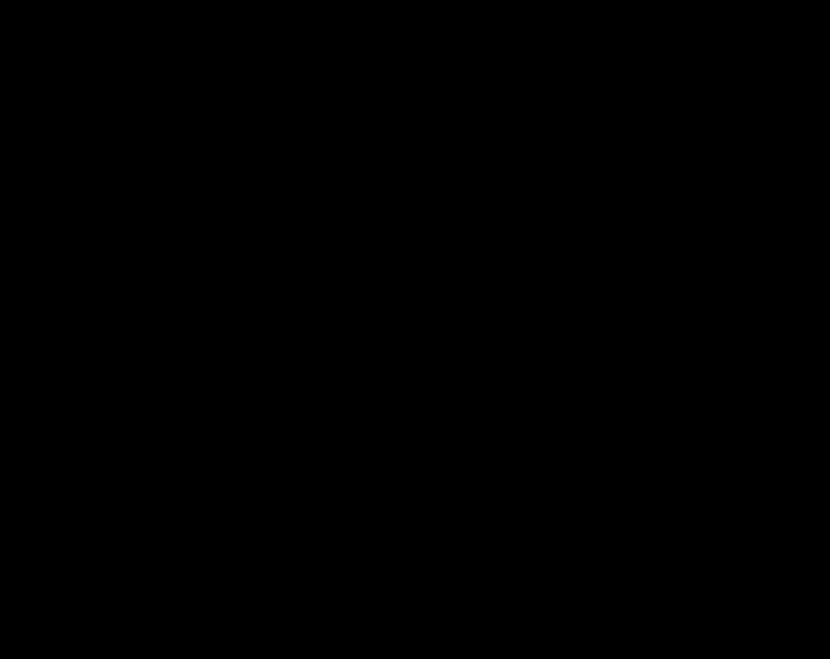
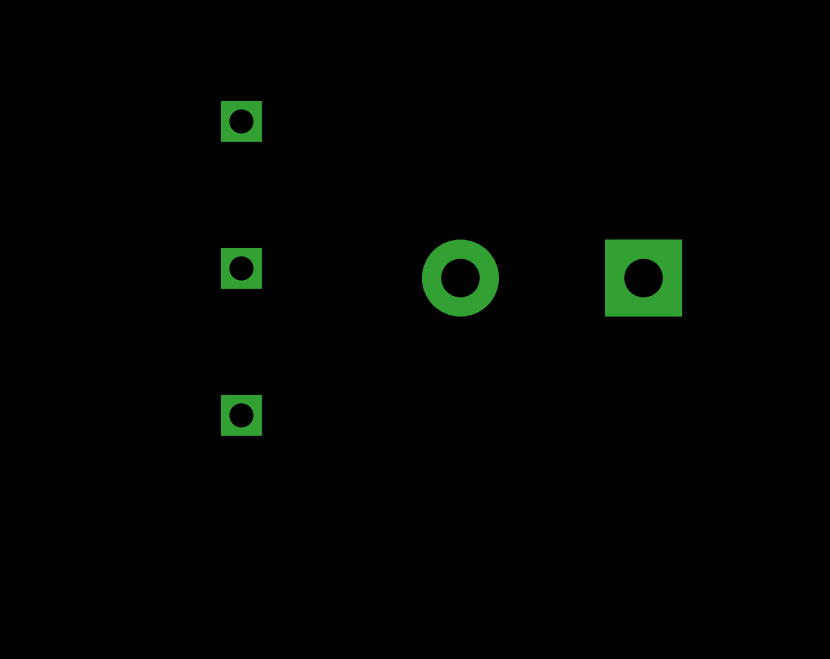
part: none -> (241, 121)
part: none -> (241, 268)
part: none -> (552, 278)
part: none -> (241, 415)

